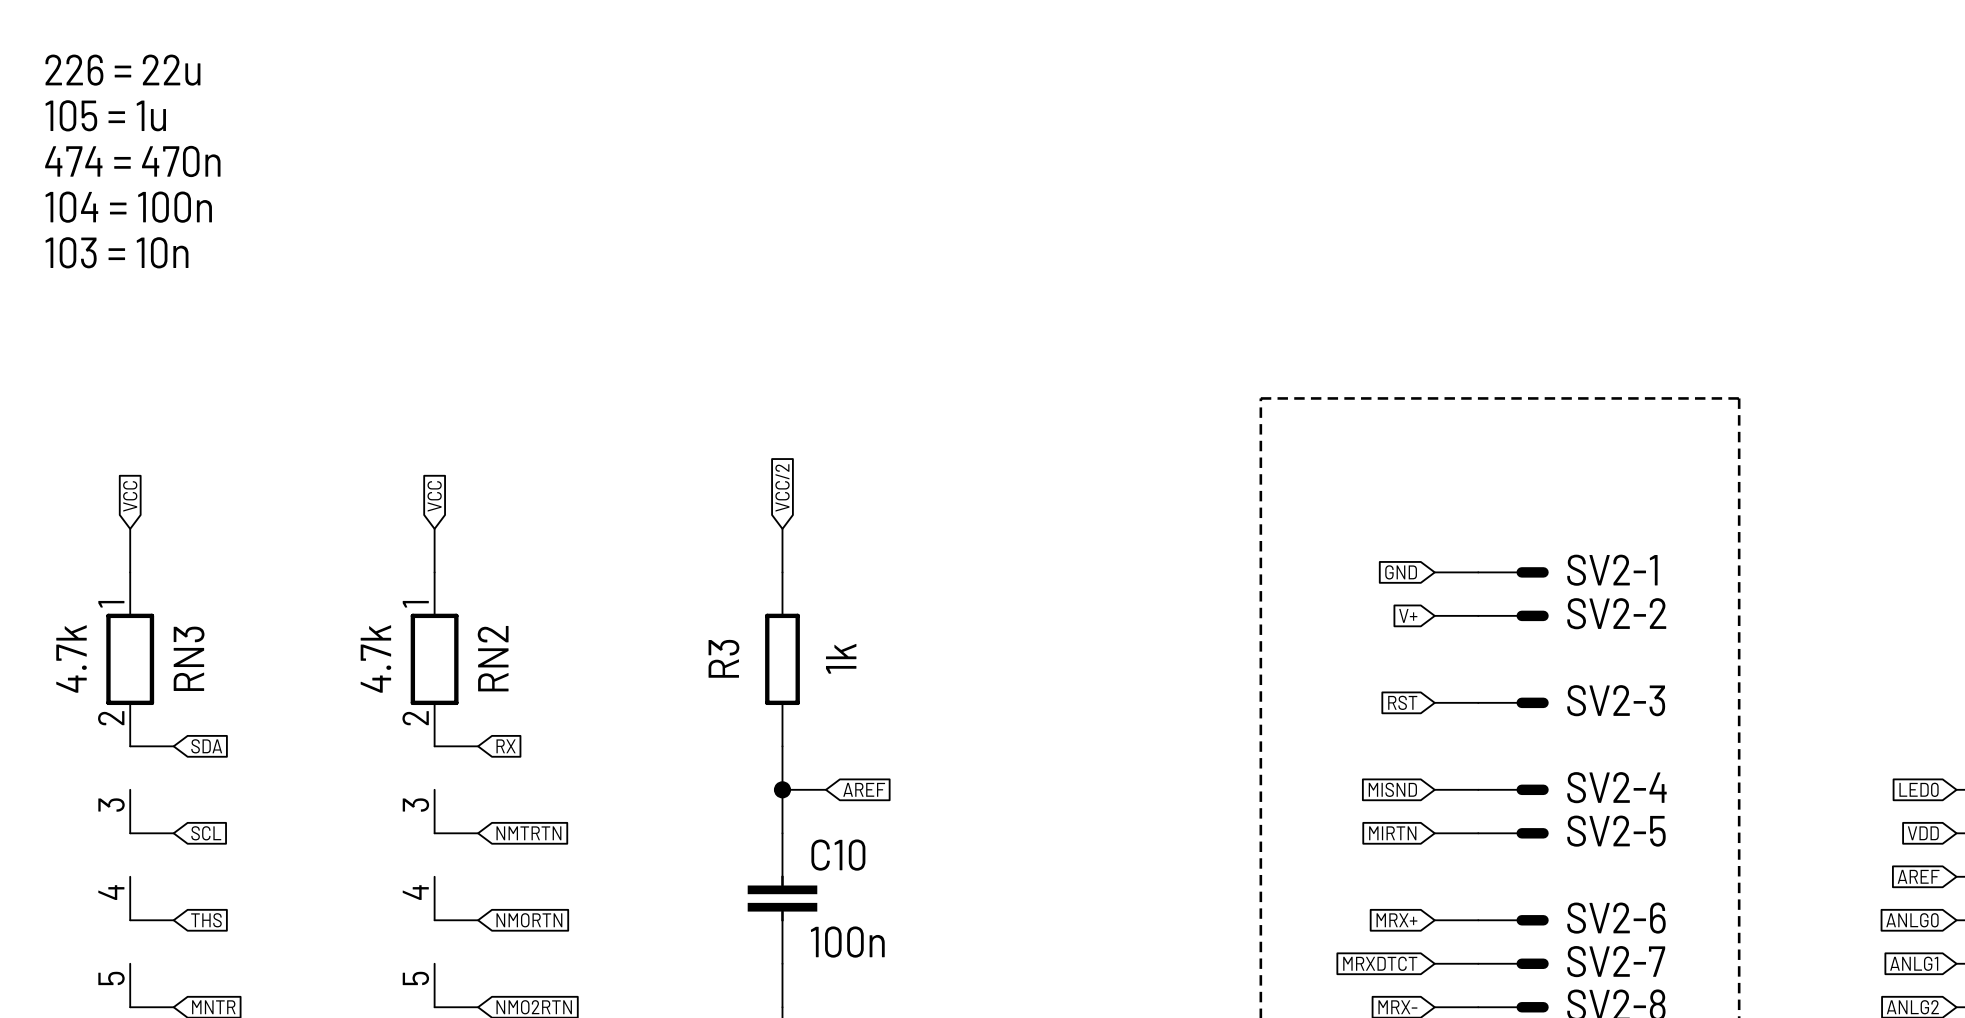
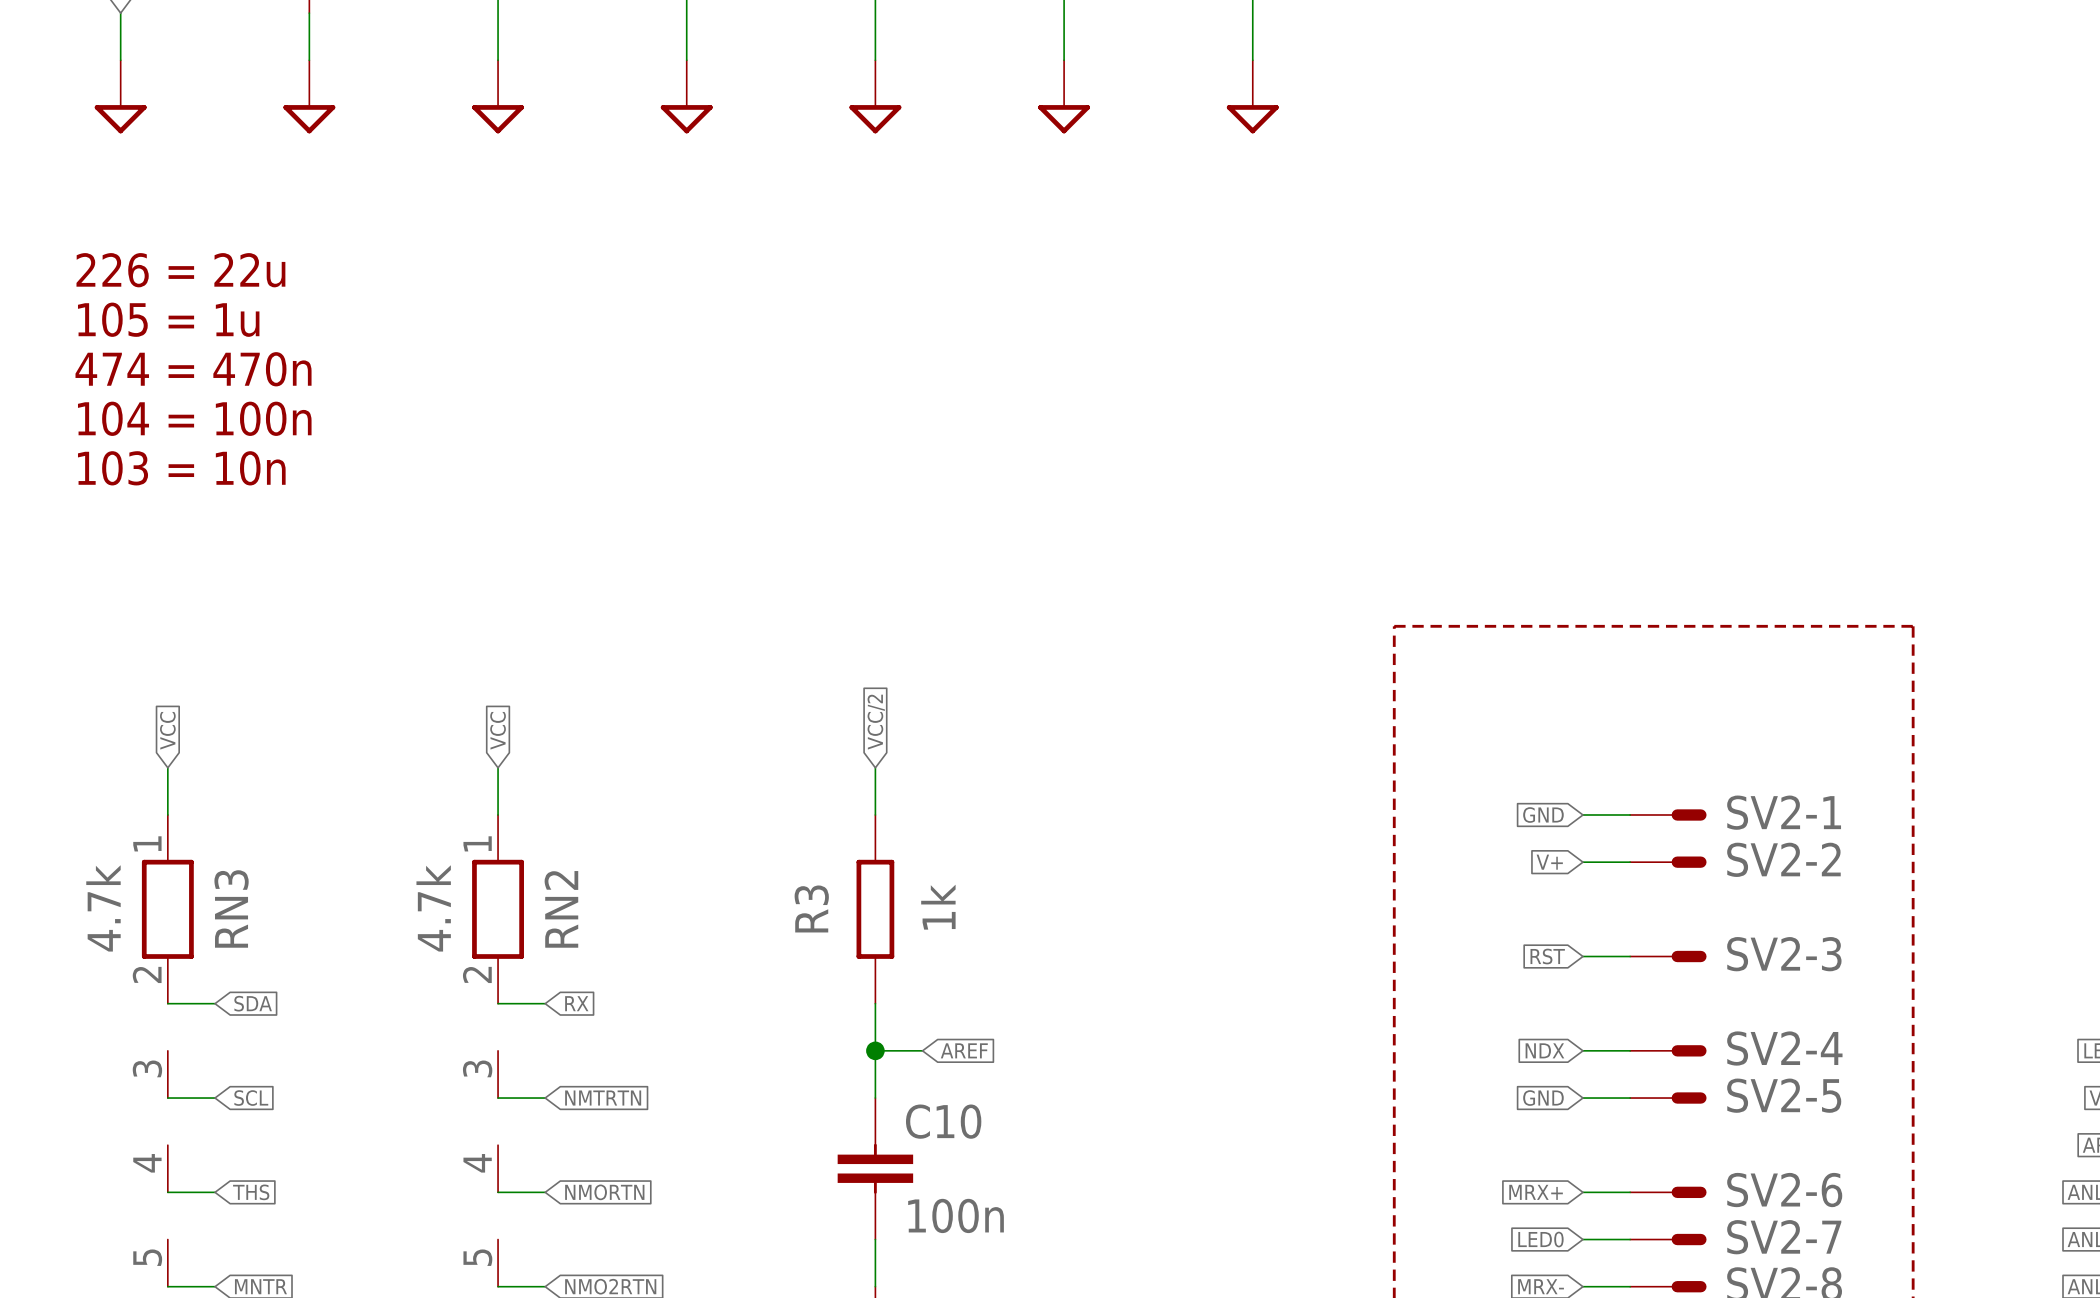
global label: MISND (1392, 789) -> NDX (1544, 1050)
global label: MIRTN (1392, 833) -> GND (1543, 1098)
global label: MRXDTCT (1380, 963) -> LED0 (1540, 1239)

